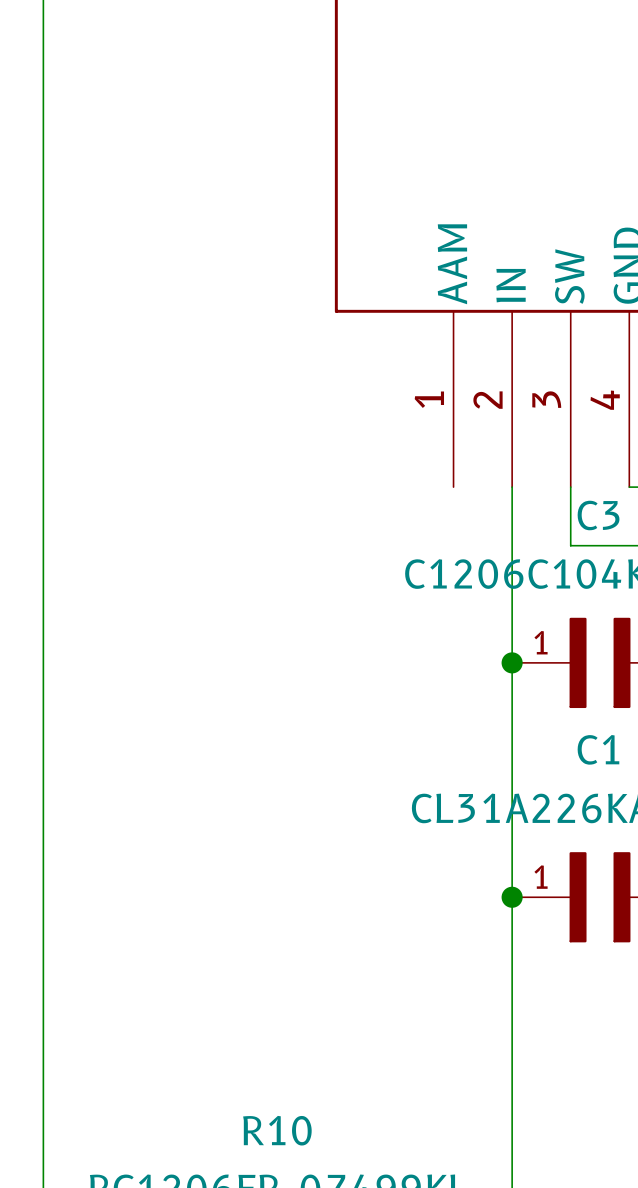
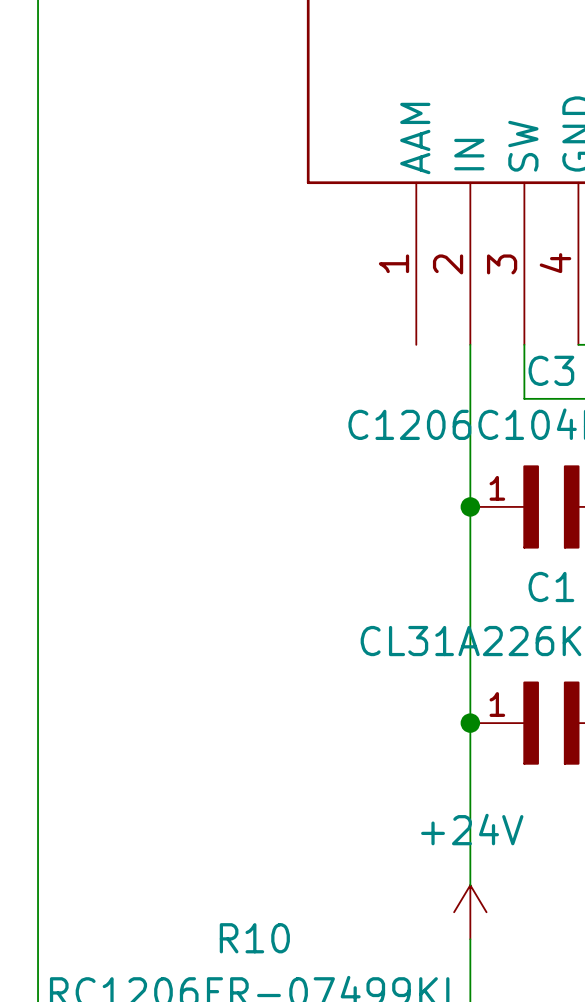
power symbol: none -> +24V (470, 912)

